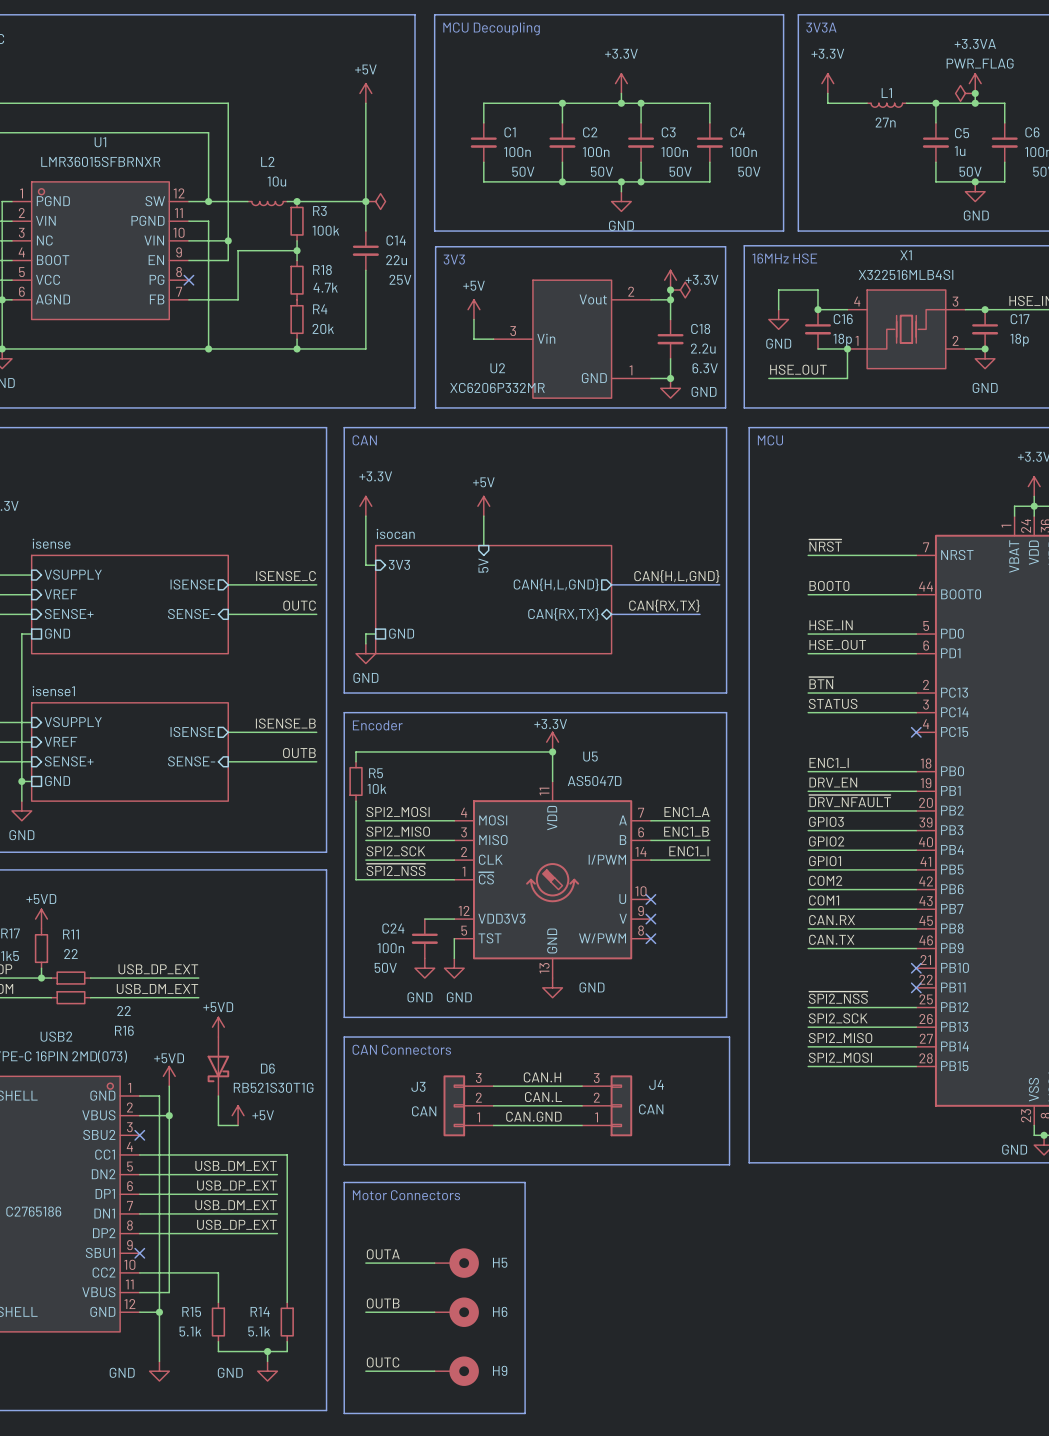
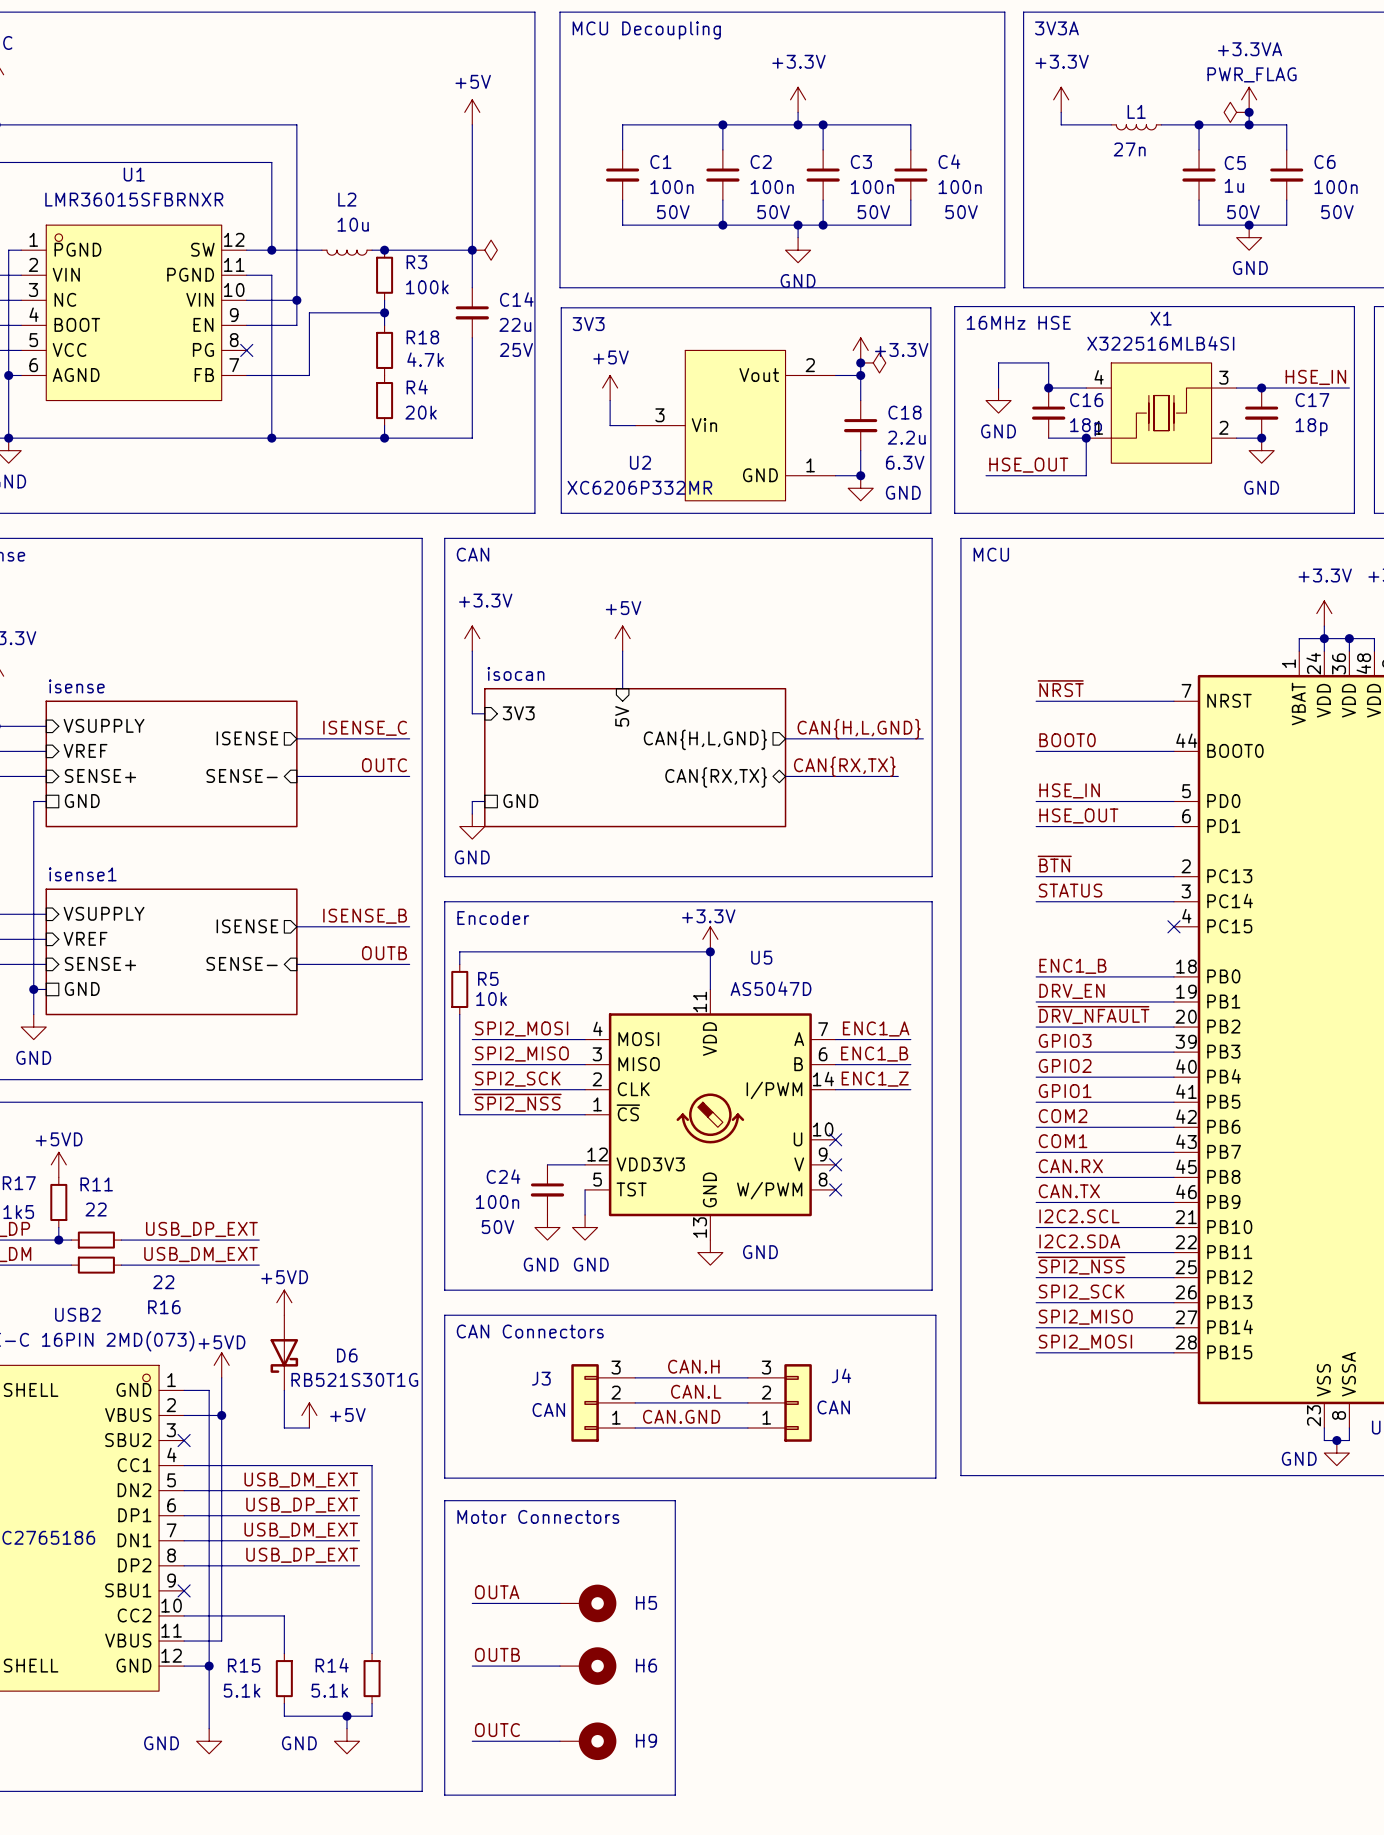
label: ENC1_I (829, 762) -> ENC1_B (1072, 966)
label: ENC1_I (688, 851) -> ENC1_Z (875, 1079)
label: none -> I2C2.SCL (1079, 1216)
wire: none -> (1036, 1227) (1173, 1227)
no-connect mark: (916, 968) -> none
label: none -> I2C2.SDA (1079, 1241)
wire: none -> (1036, 1252) (1173, 1252)
no-connect mark: (916, 987) -> none

